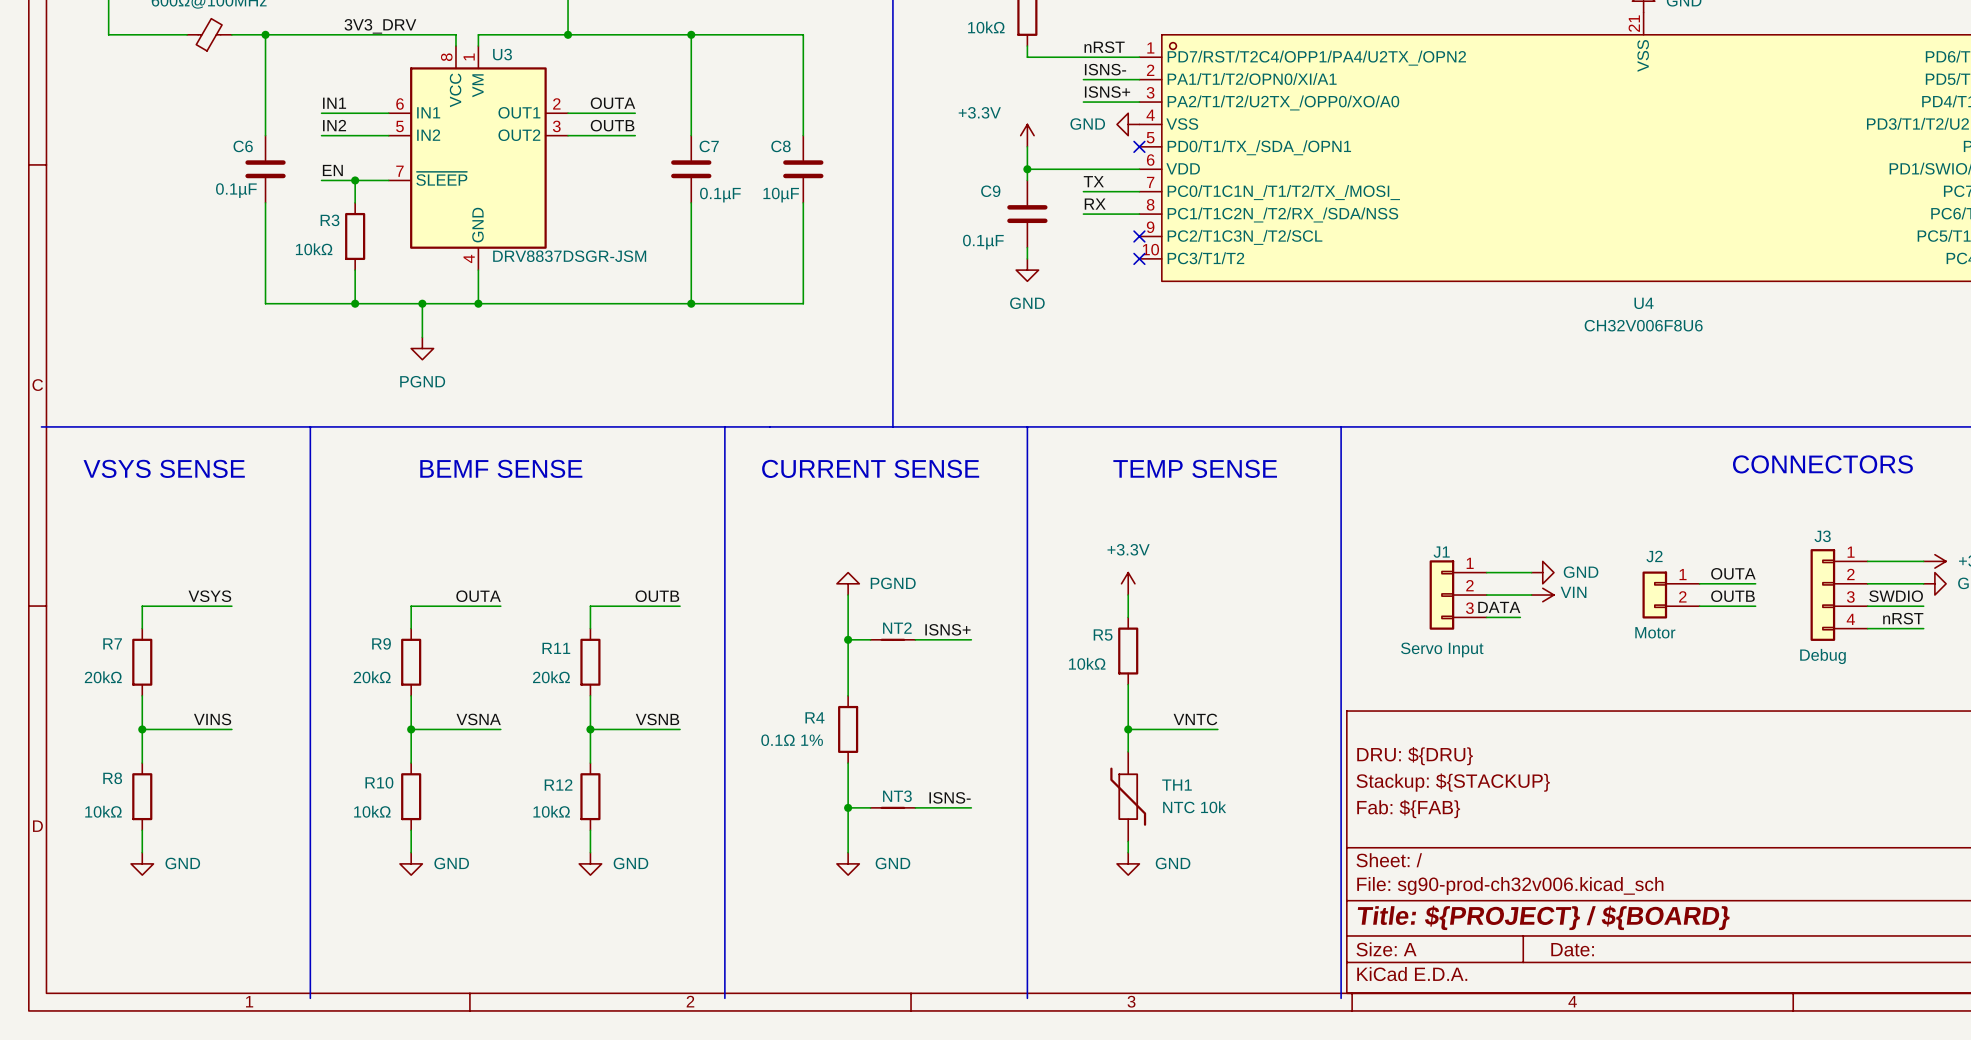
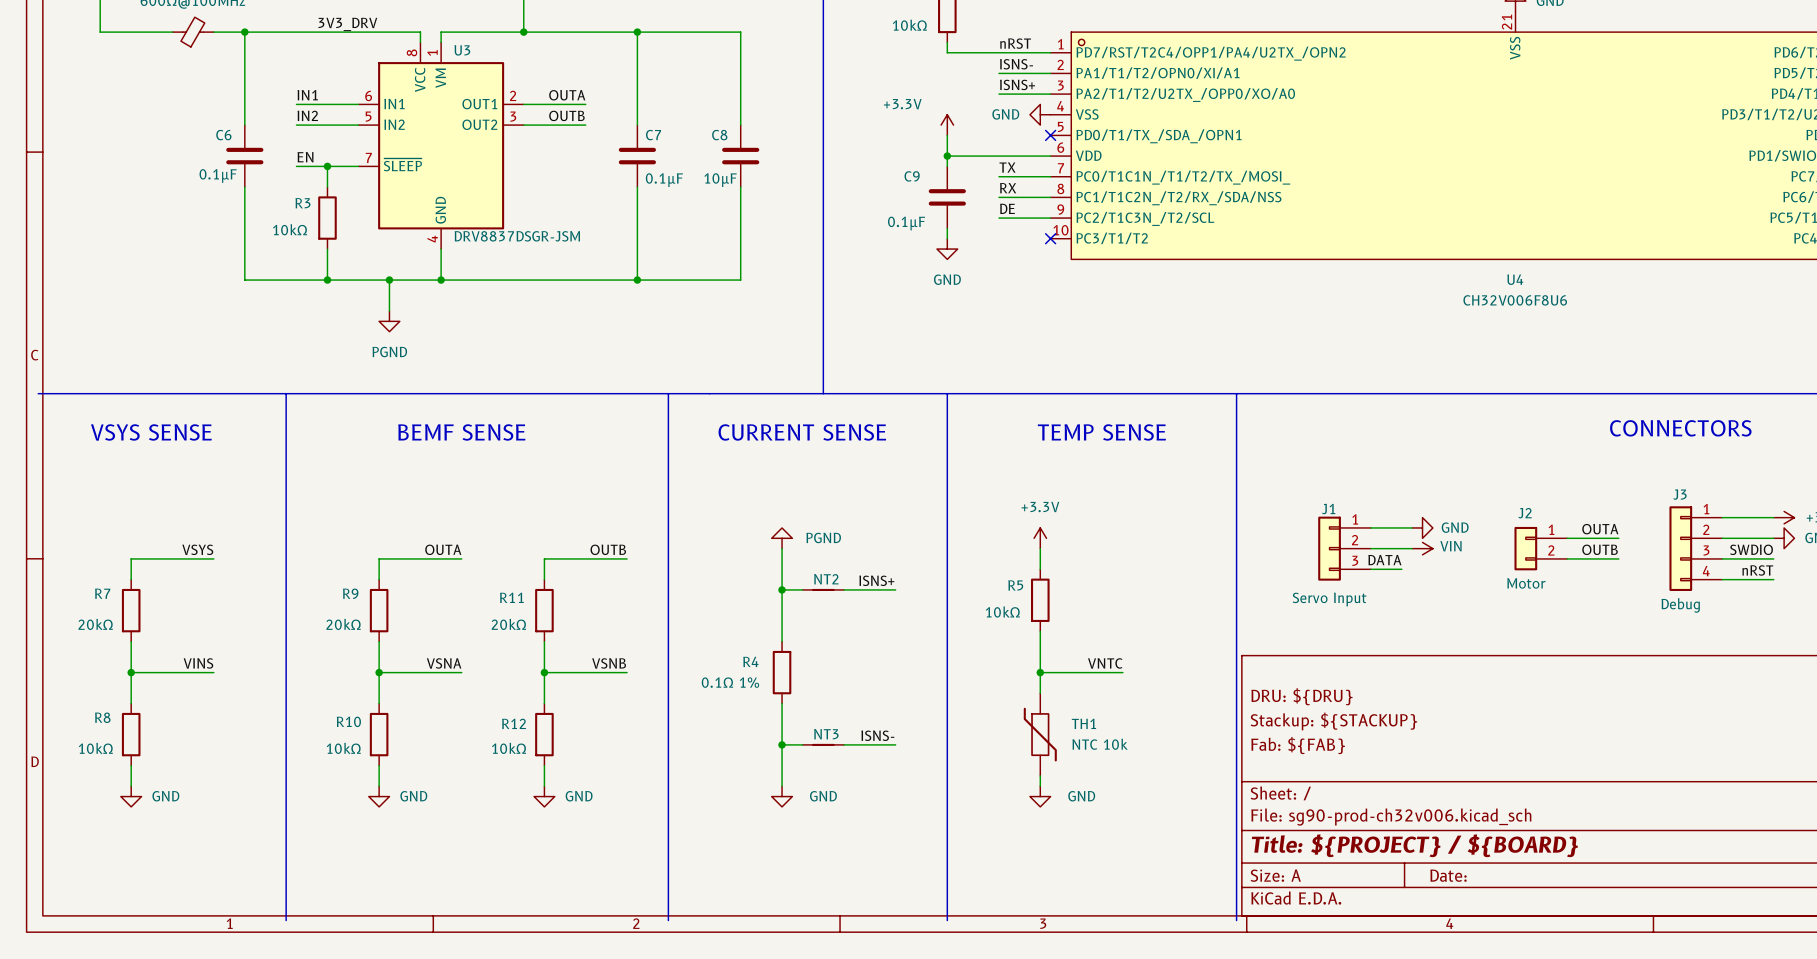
label: none -> DE (1007, 208)
wire: none -> (998, 218) (1050, 218)
no-connect mark: (1139, 236) -> none

